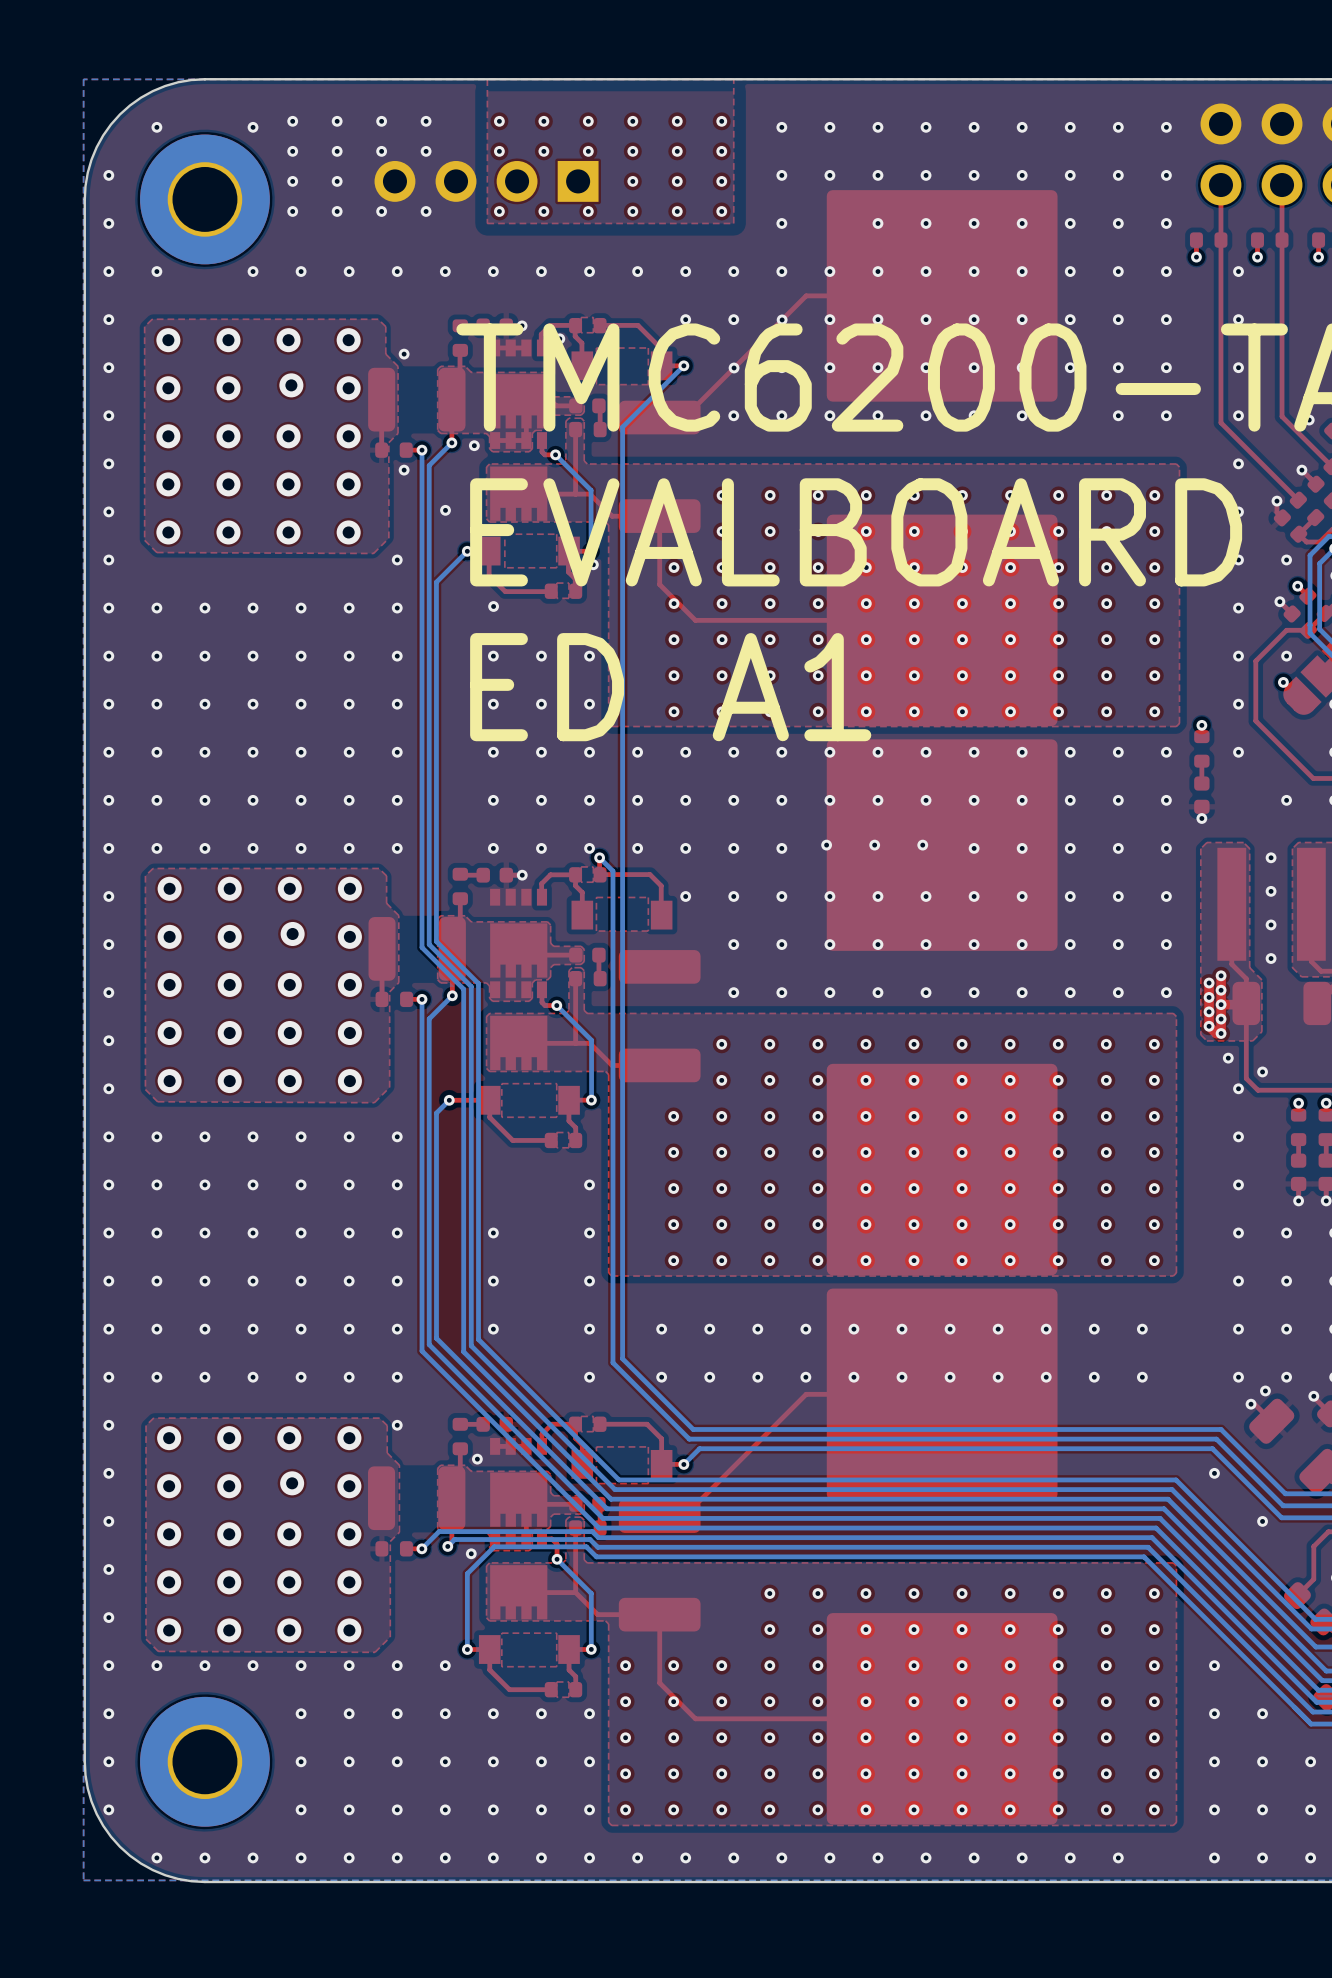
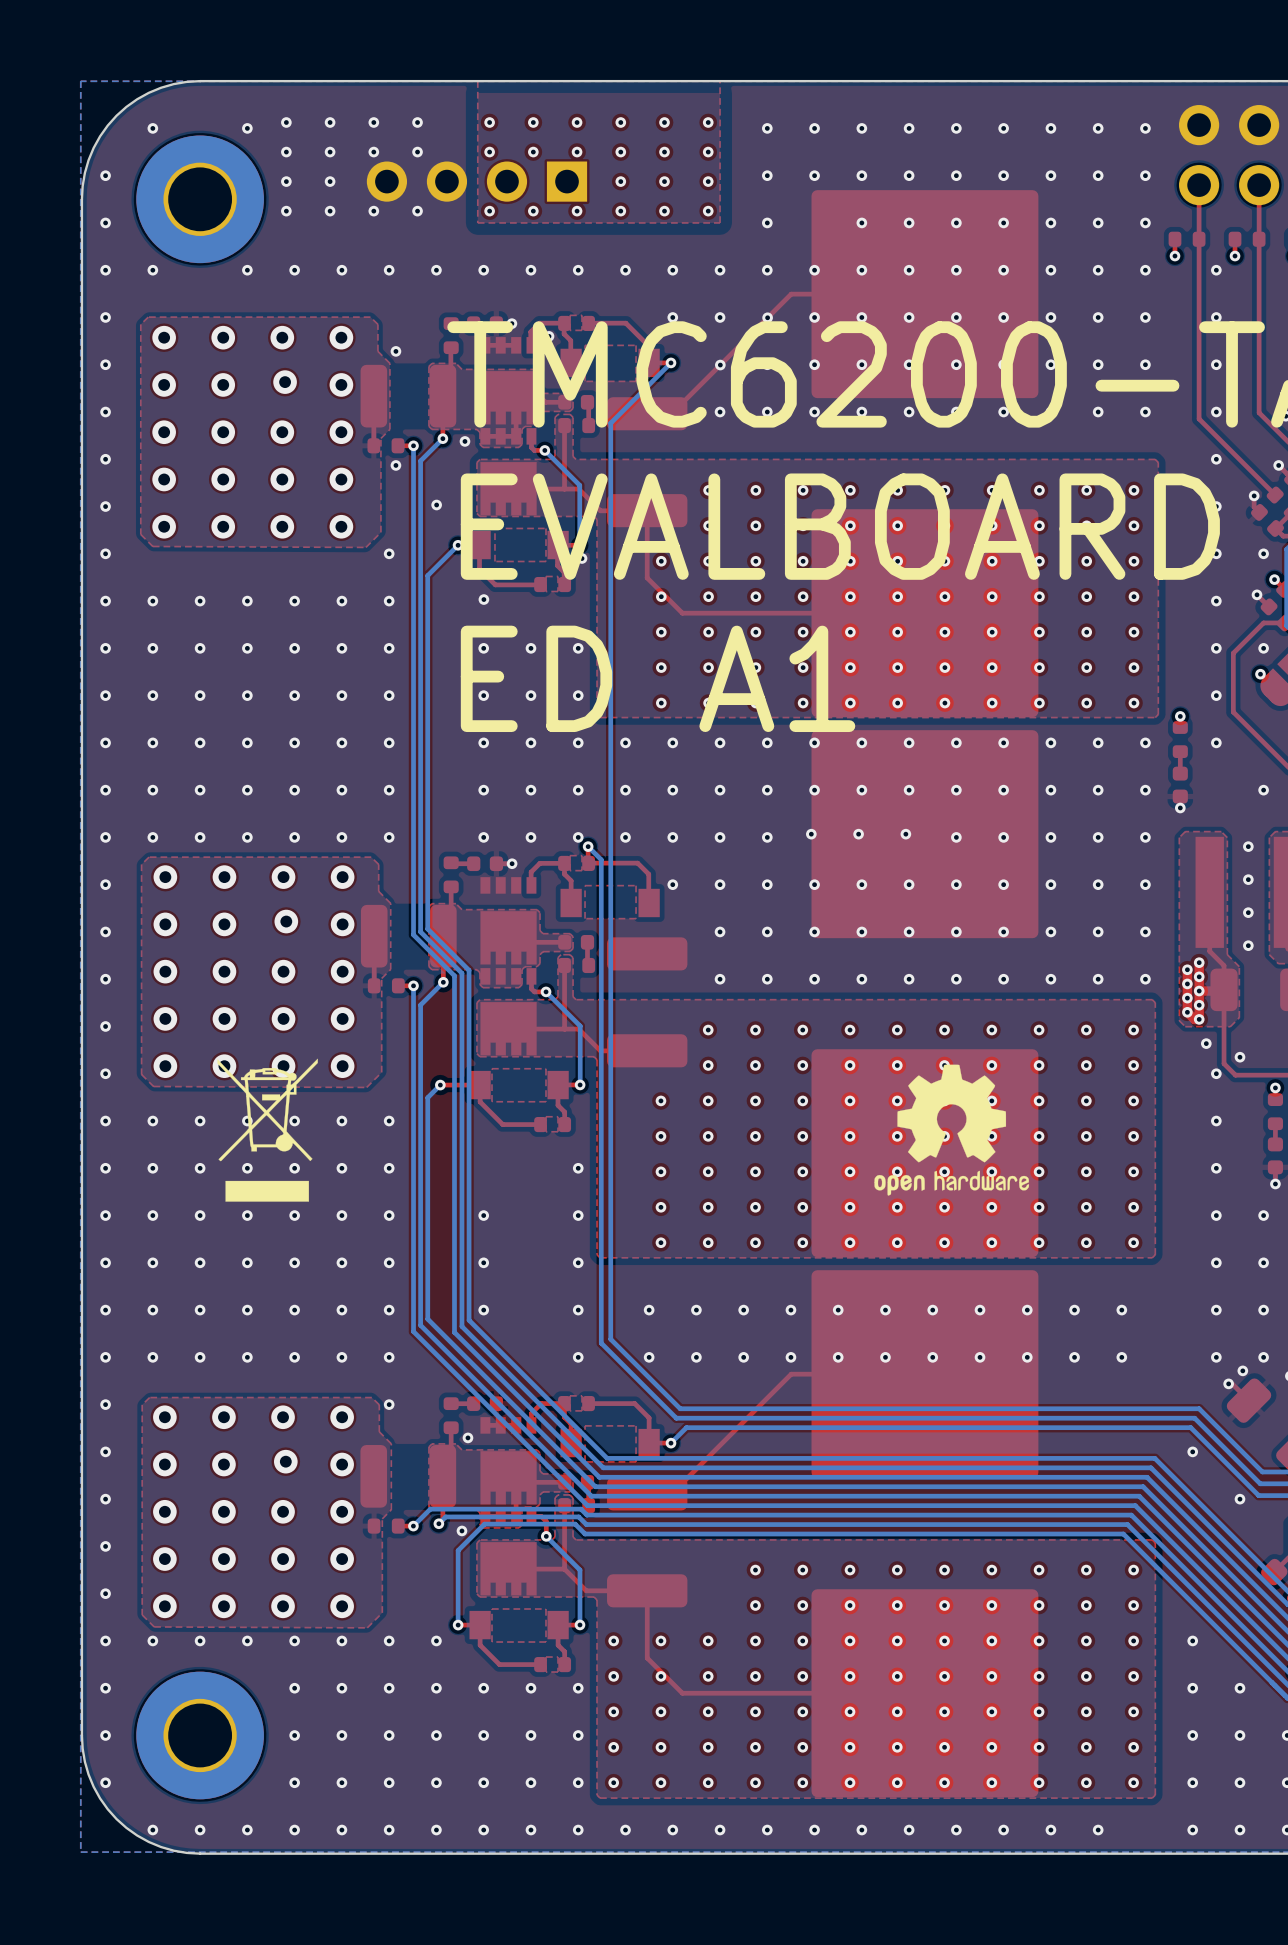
drawing: none -> [217, 1058, 318, 1202]
drawing: none -> [874, 1064, 1030, 1196]

